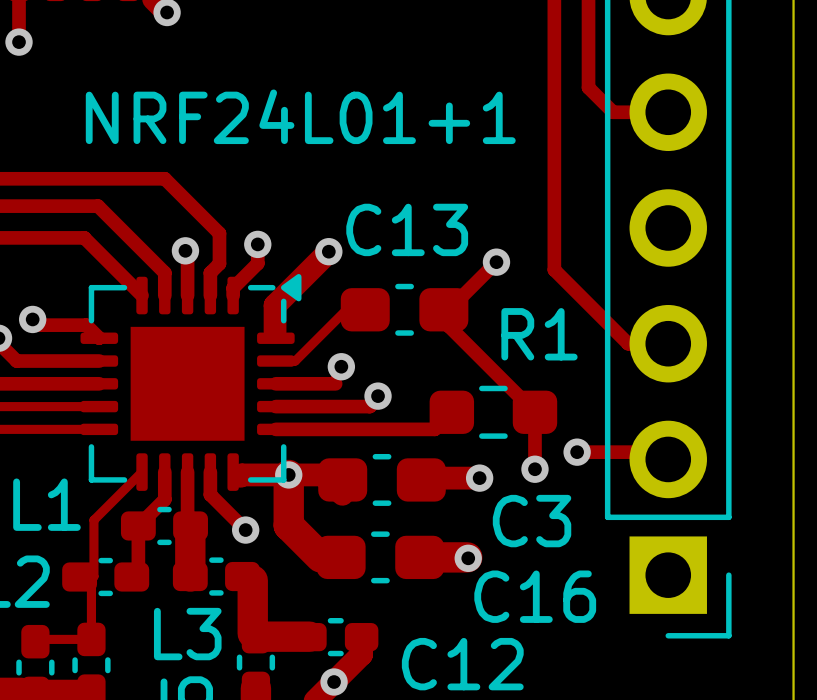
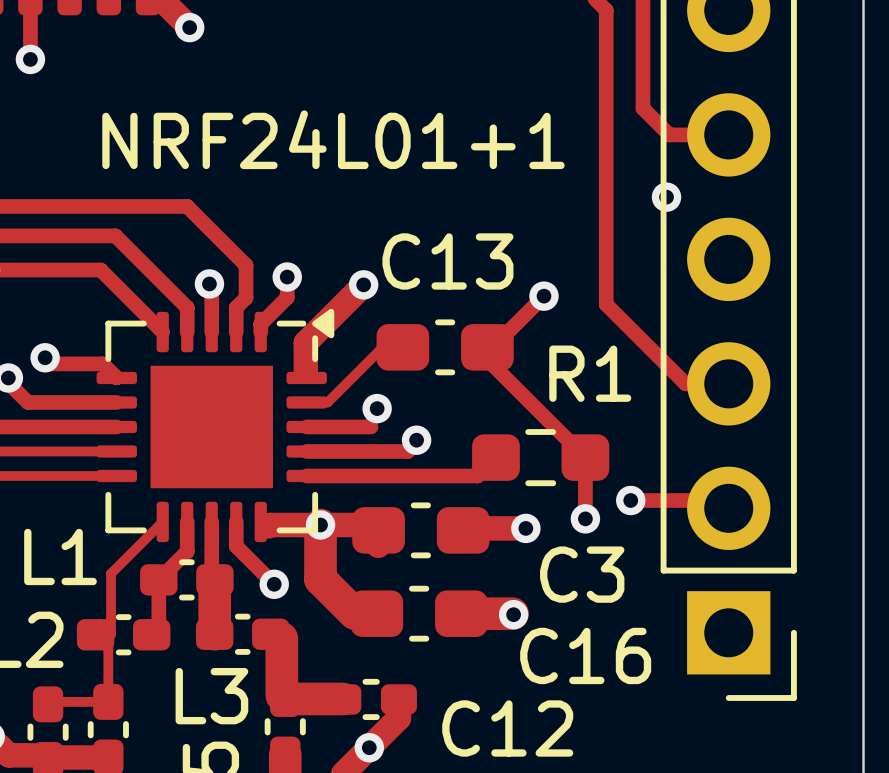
via: none -> (666, 197)

